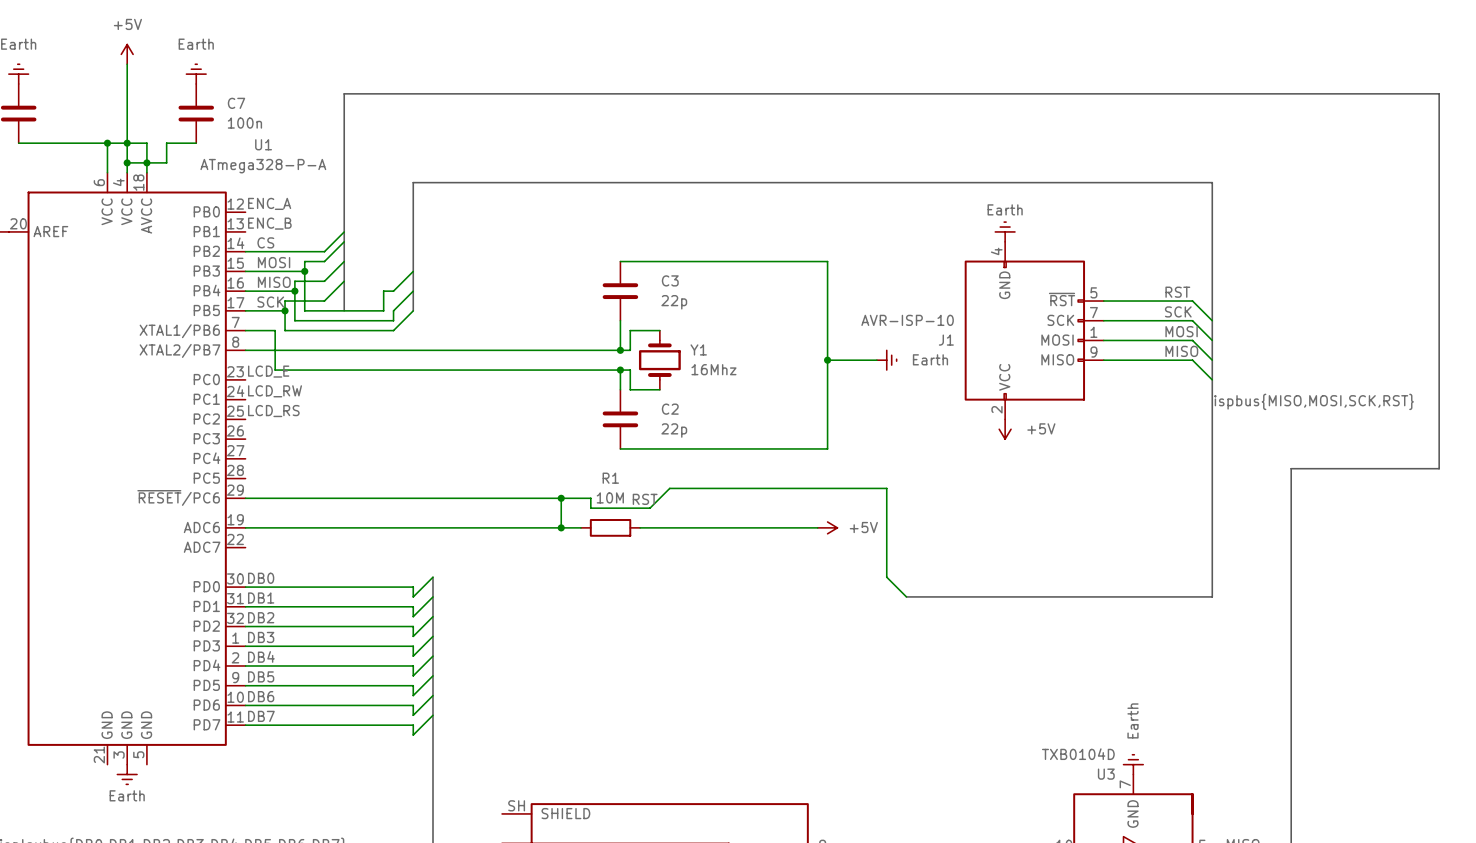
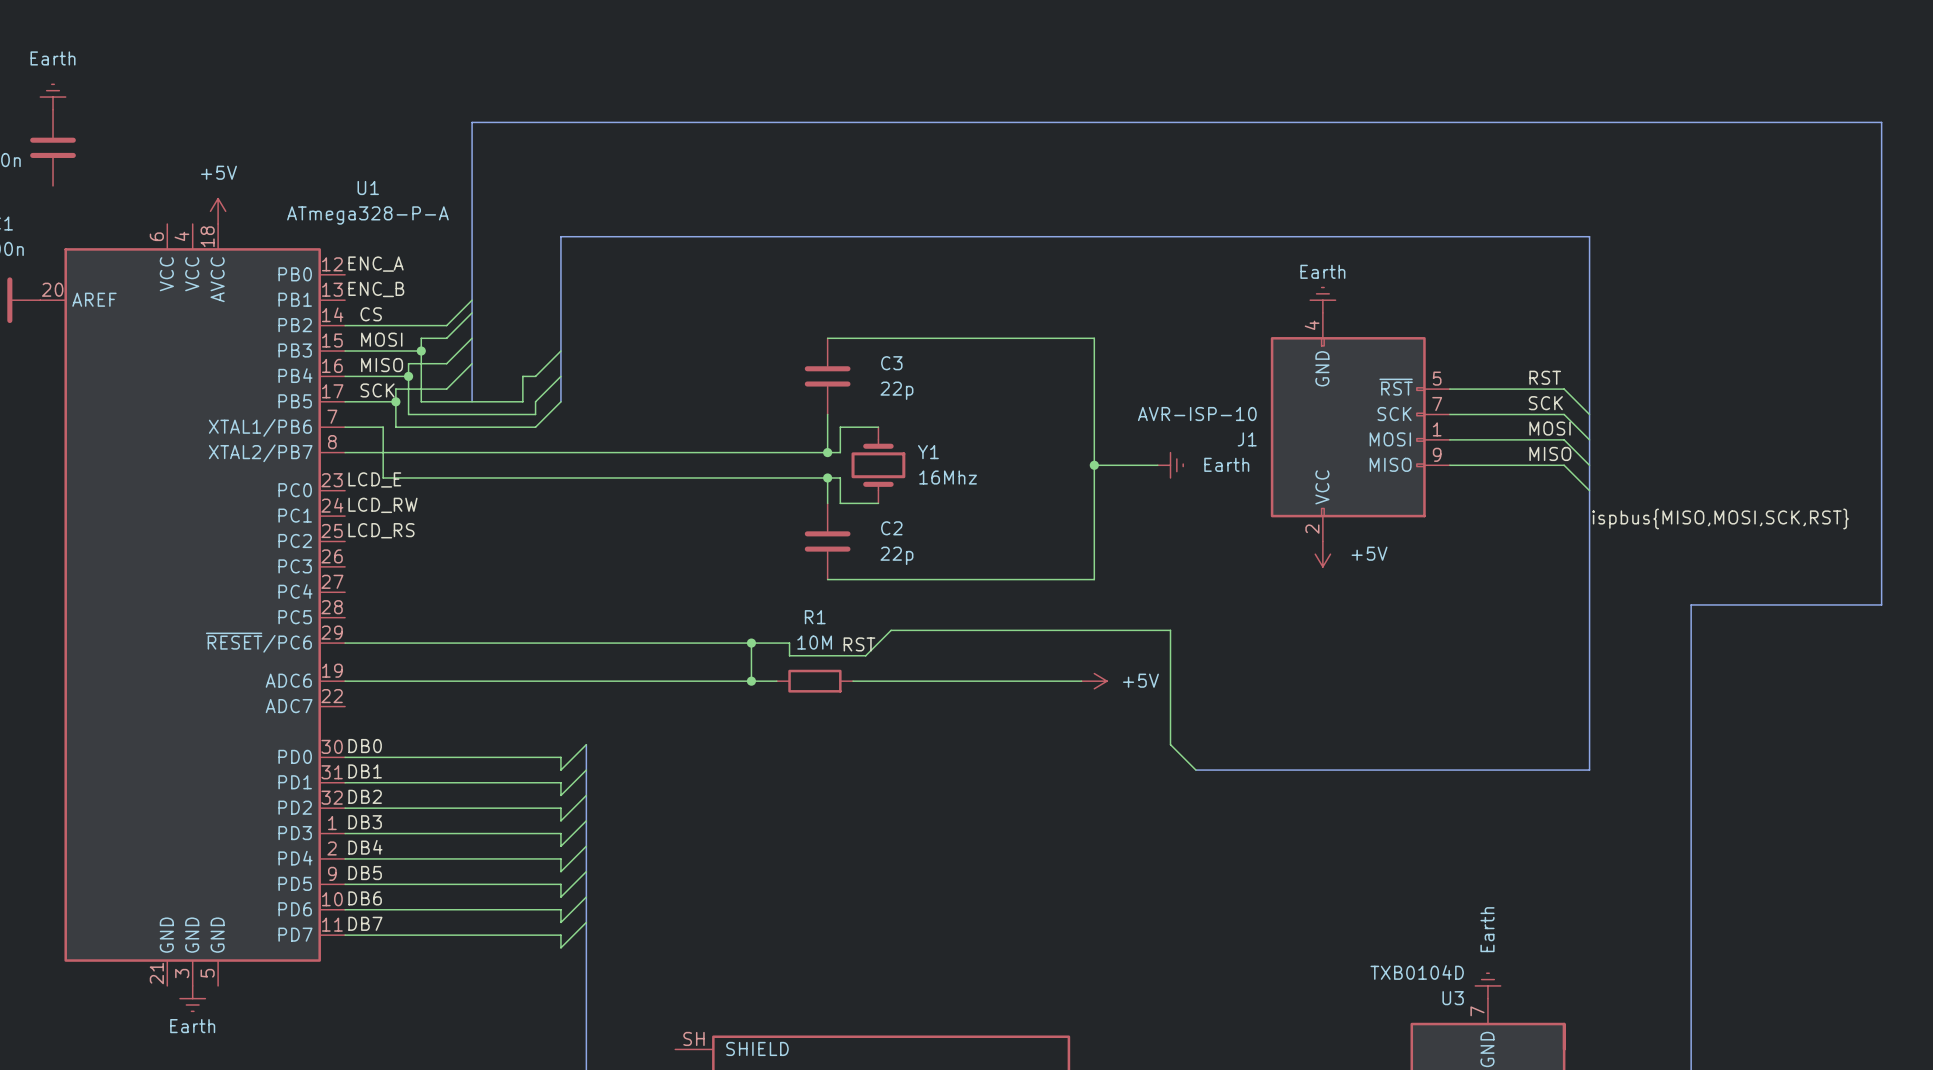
power symbol position: +5V (127, 54) -> +5V (218, 211)
wire: (127, 64) (127, 172) -> none
power symbol: Earth (196, 74) -> none
C7: 100n (196, 113) -> none
wire: (18, 143) (146, 143) (146, 172) -> none
wire: (107, 143) (107, 172) -> none
junction: (107, 143) -> none
junction: (127, 143) -> none
wire: (196, 143) (166, 143) (166, 162) (127, 162) -> none
junction: (127, 162) -> none
junction: (146, 162) -> none

